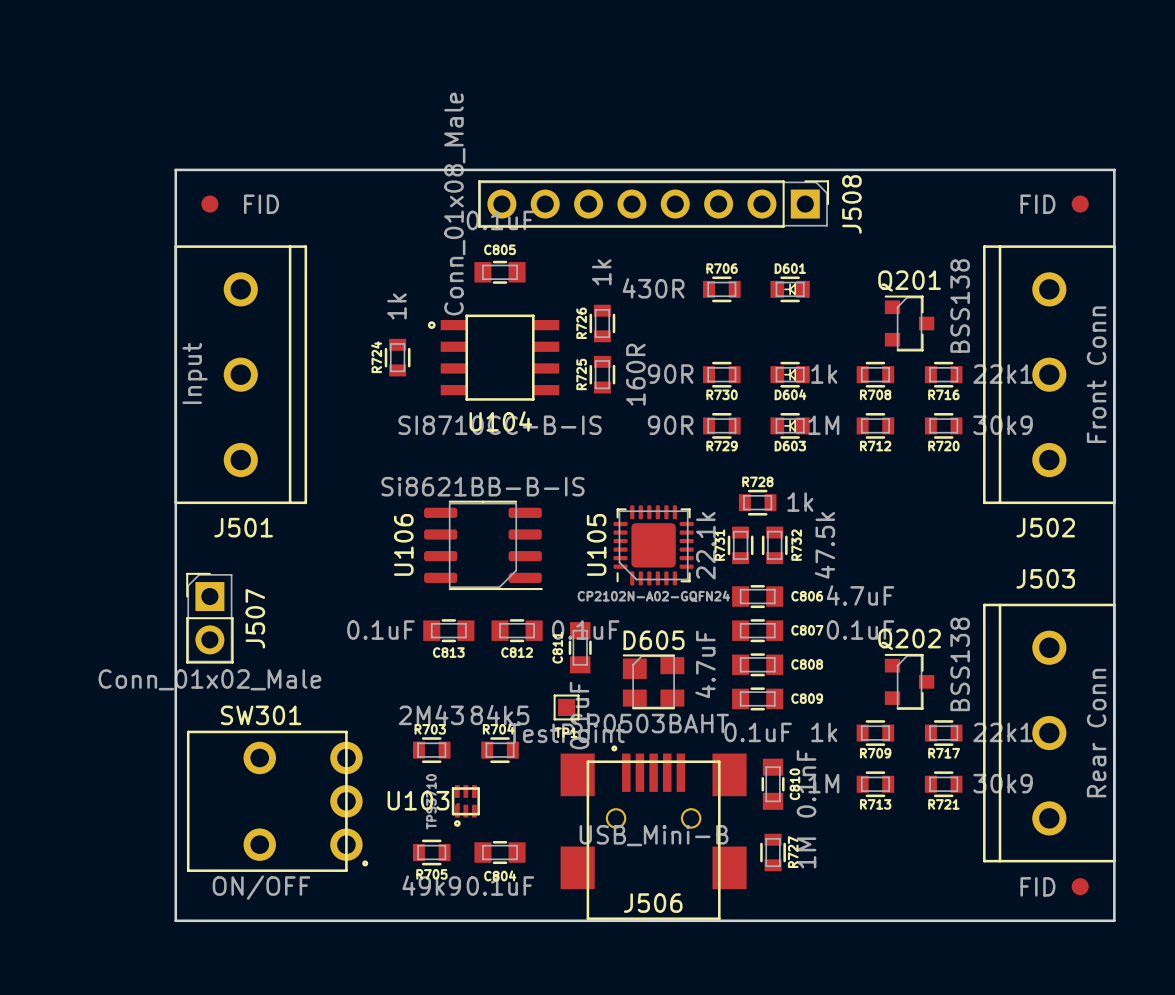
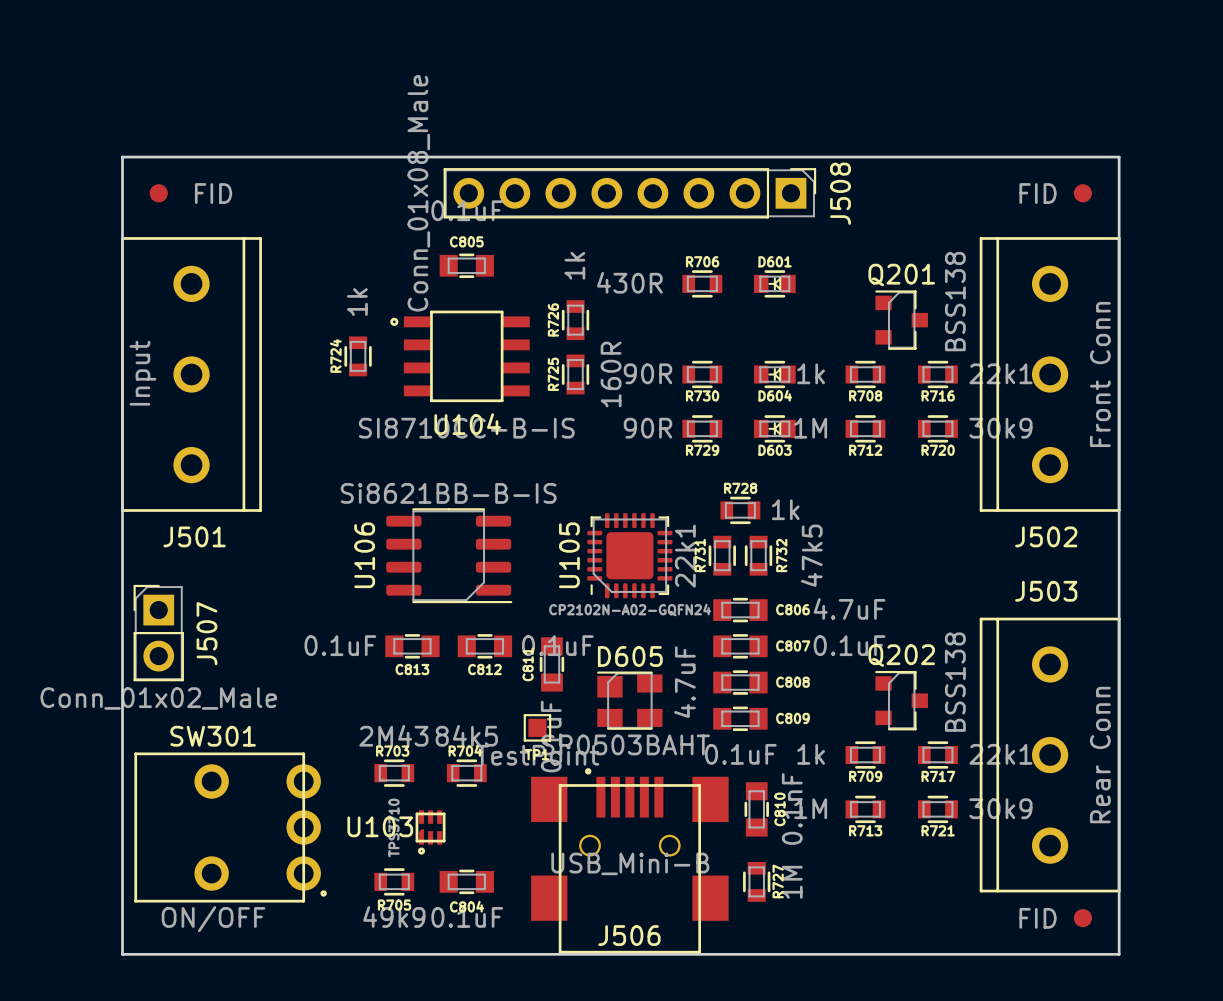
R731 value: 22.1k (705, 545) -> 22k1 (685, 556)
R732 value: 47.5k (824, 545) -> 47k5 (811, 555)

